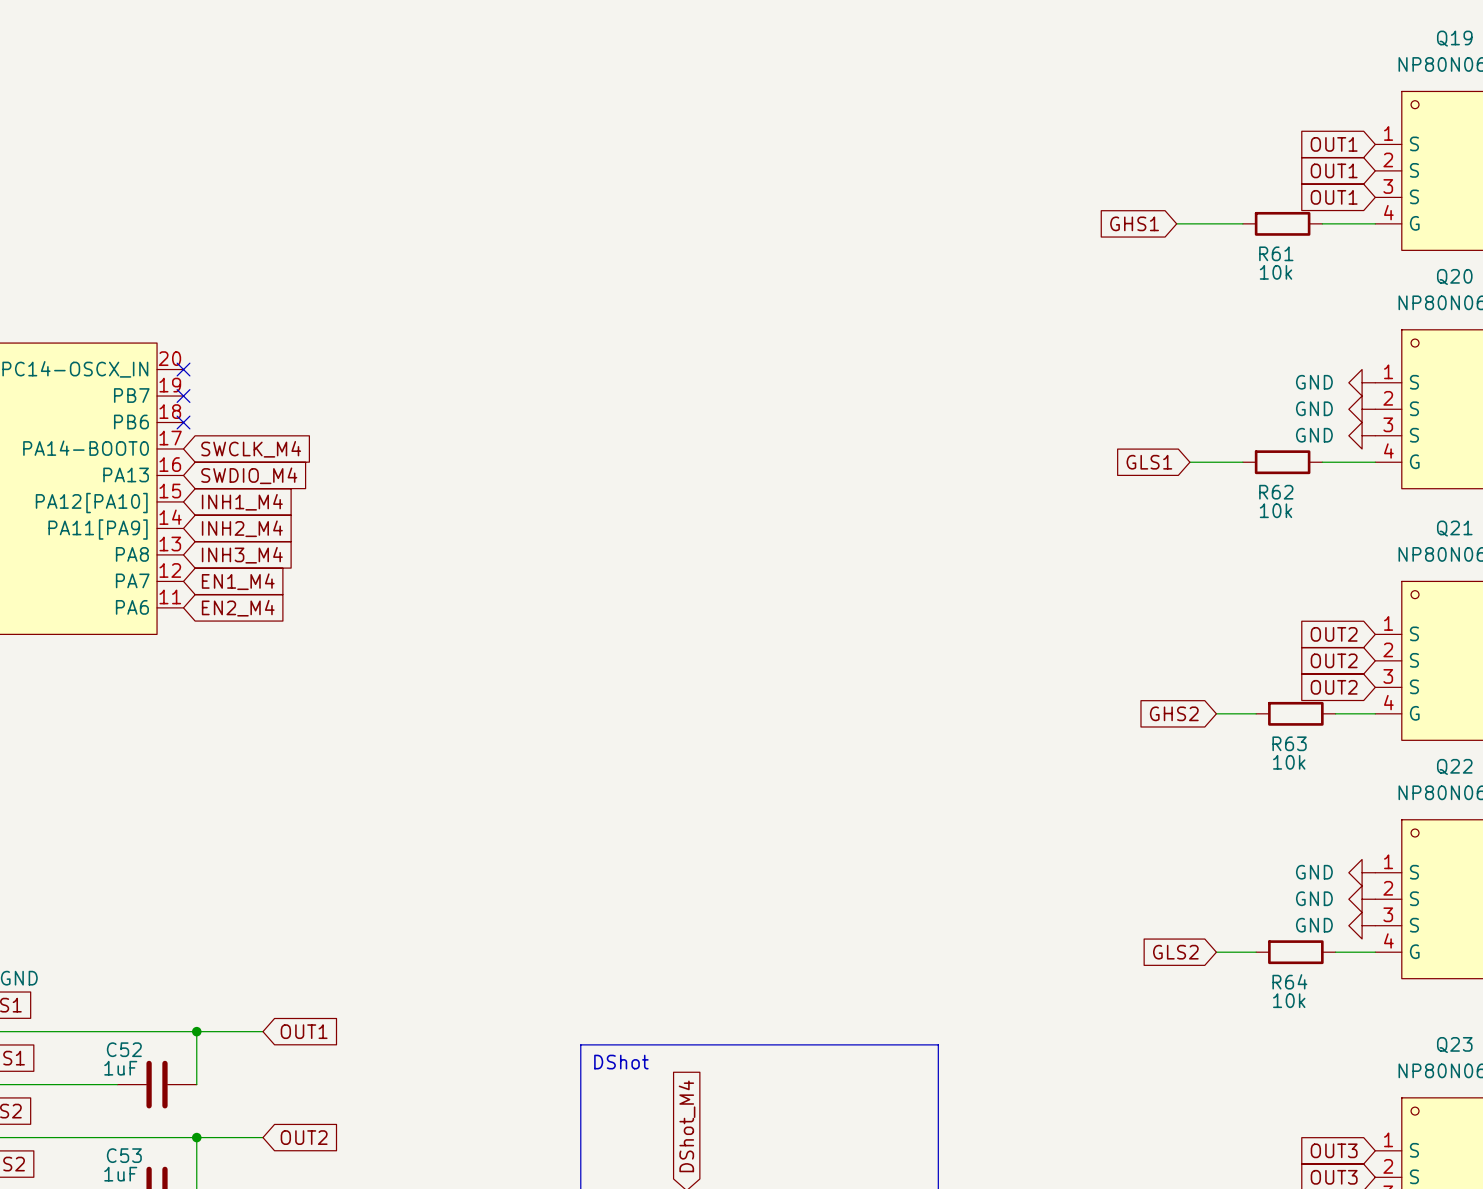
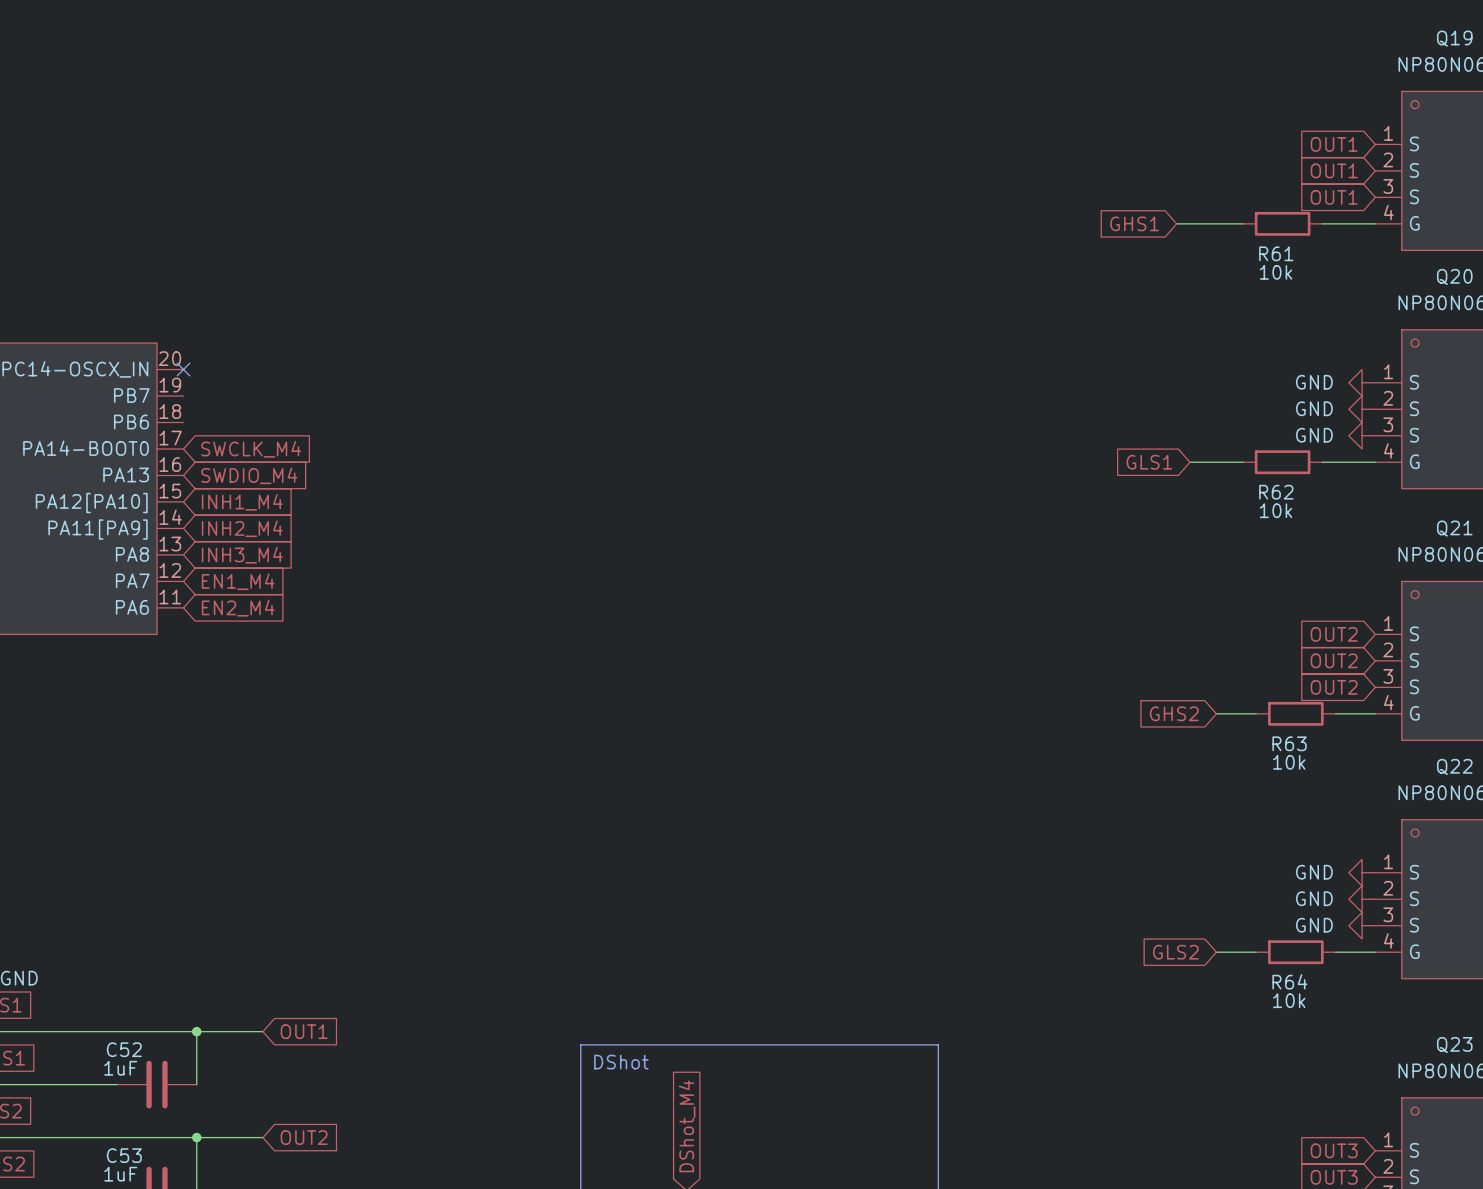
no-connect mark: (183, 396) -> none
no-connect mark: (183, 422) -> none

